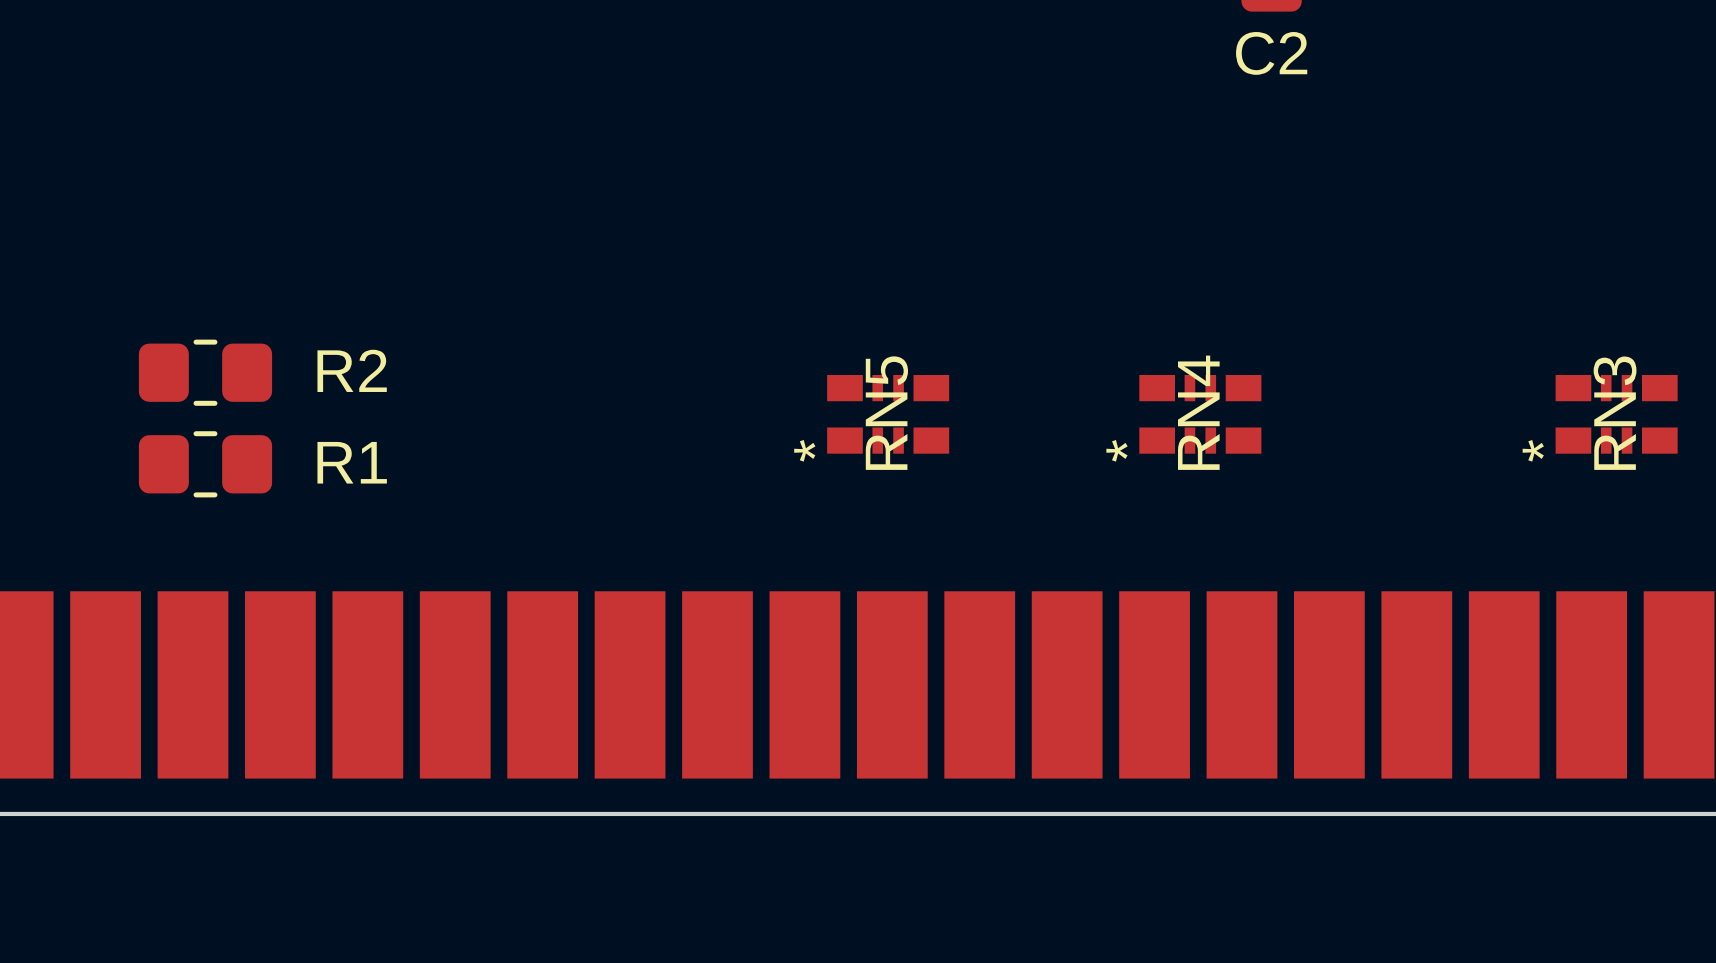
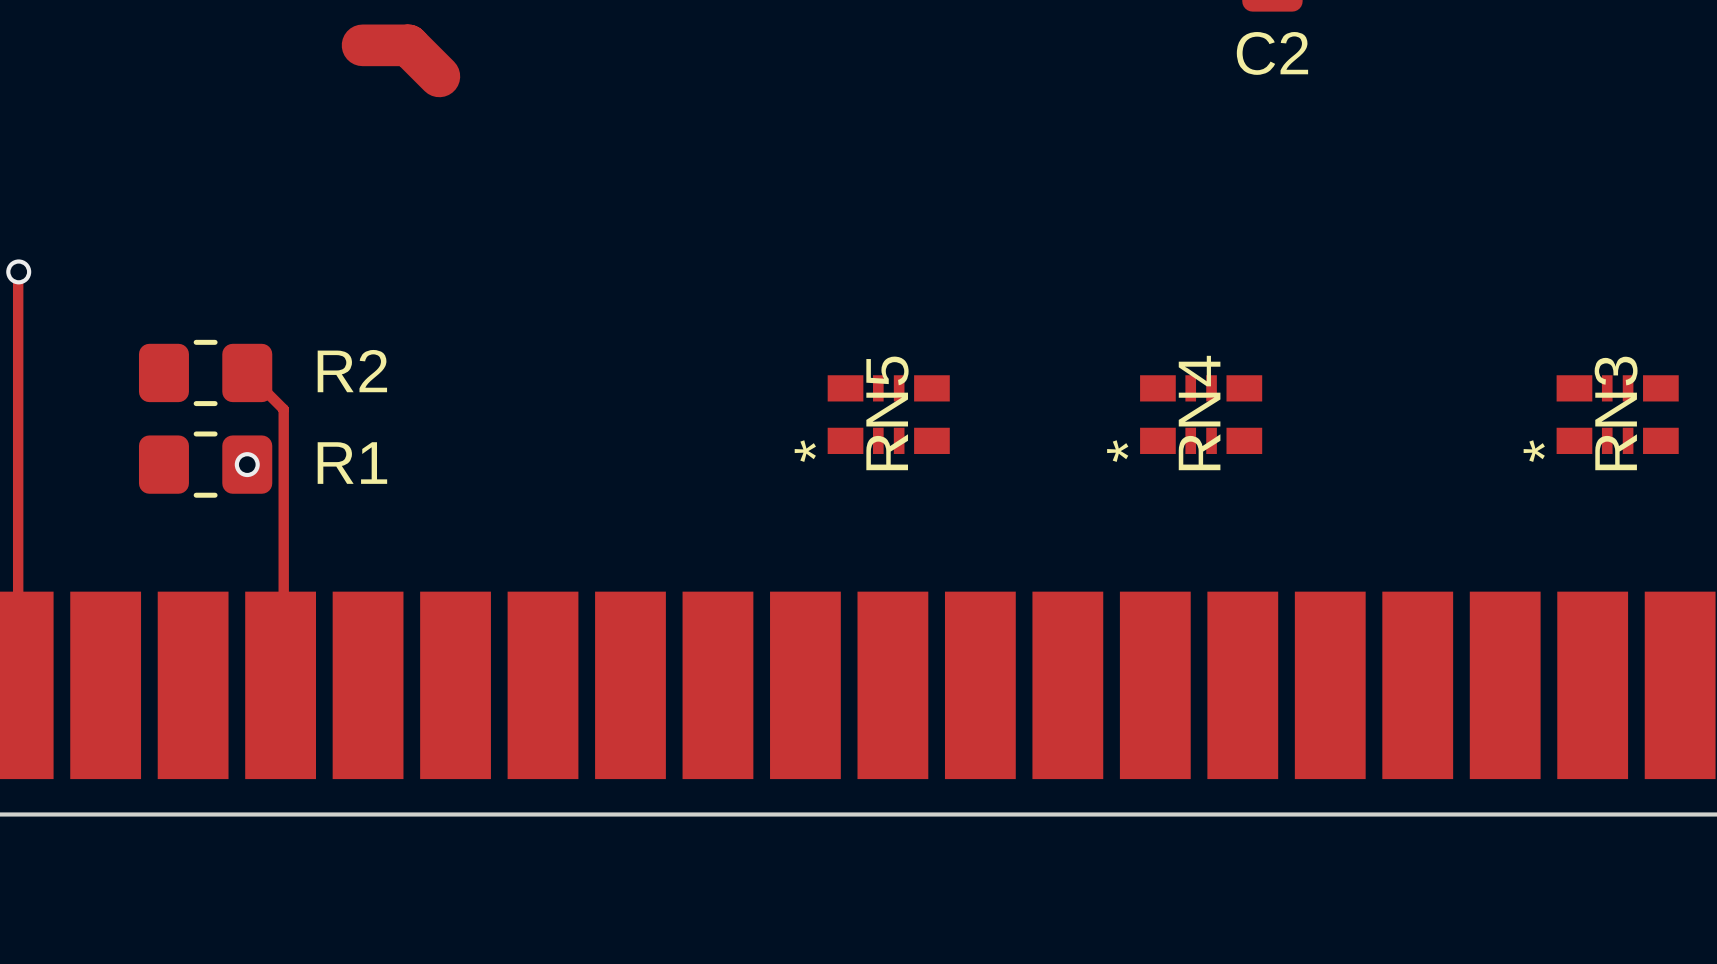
track: none -> (362, 45) (408, 45) (439, 76)
via: none -> (18, 271)
track: none -> (18, 272) (18, 685)
track: none -> (247, 372) (283, 409) (283, 682) (280, 685)
via: none -> (247, 464)

